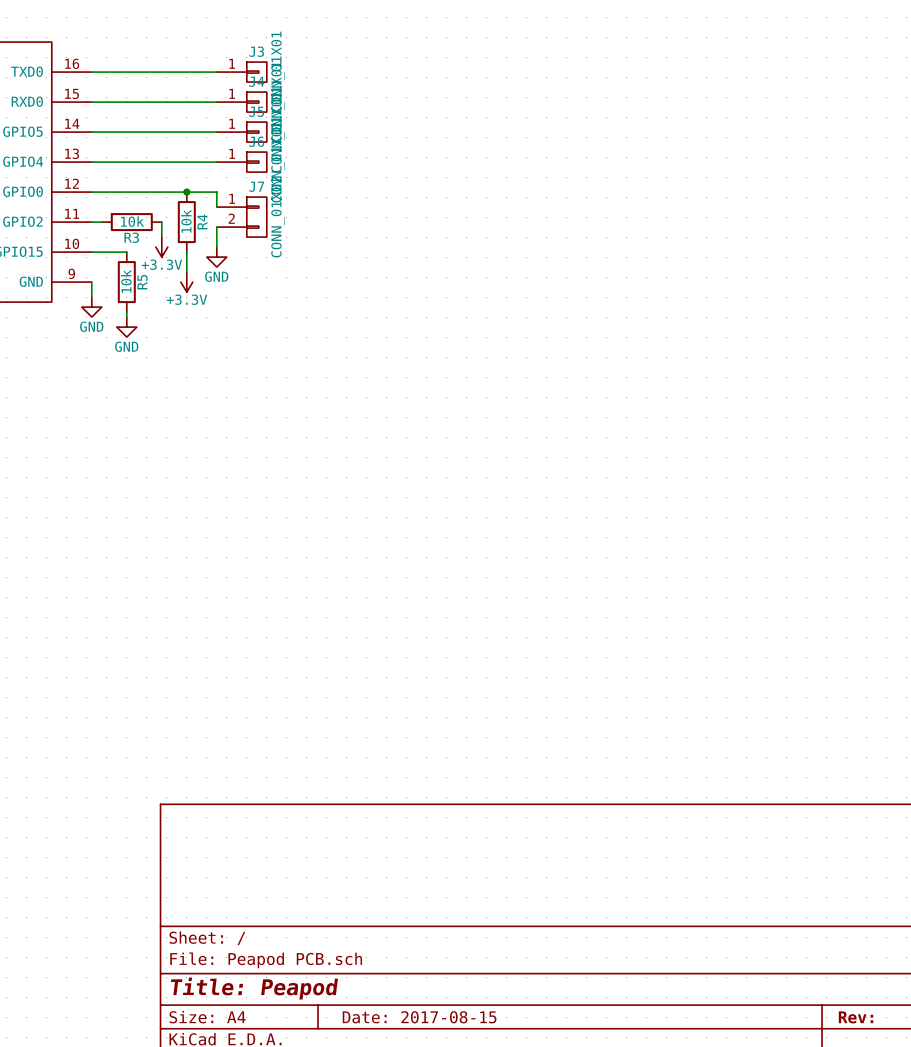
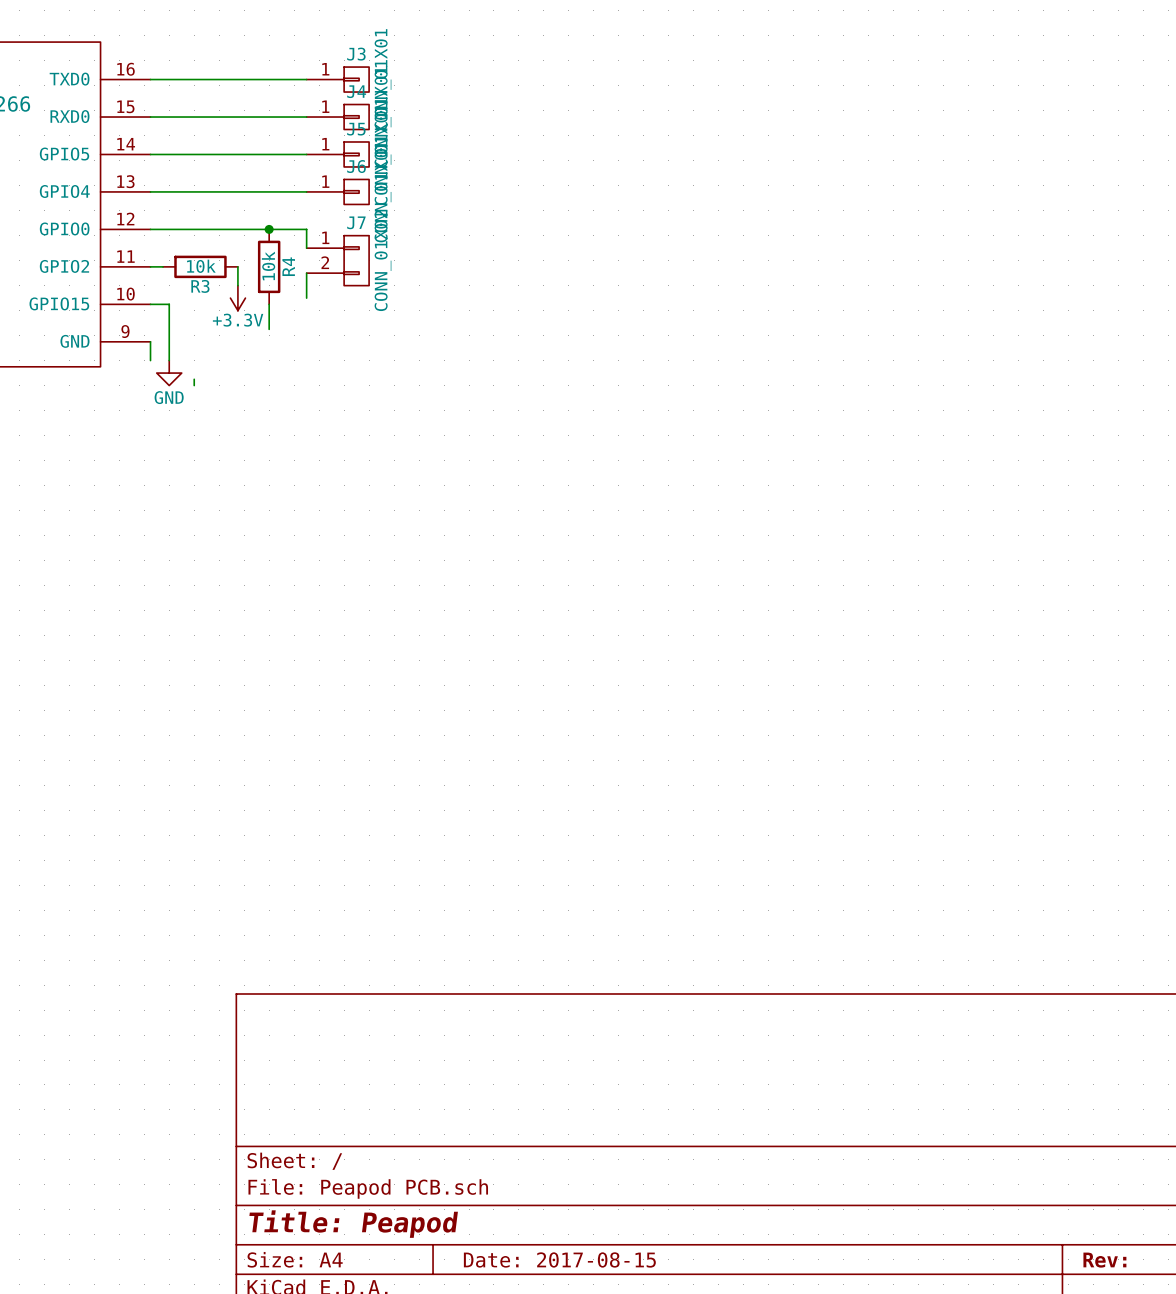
wire: (106, 252) (126, 252) -> (169, 304) (169, 360)
power symbol: GND (216, 257) -> none
R5: 10k (126, 282) -> none
power symbol: +3.3V (186, 282) -> none
power symbol: GND (91, 307) -> none
power symbol: none -> GND (169, 373)
power symbol: GND (126, 327) -> none

